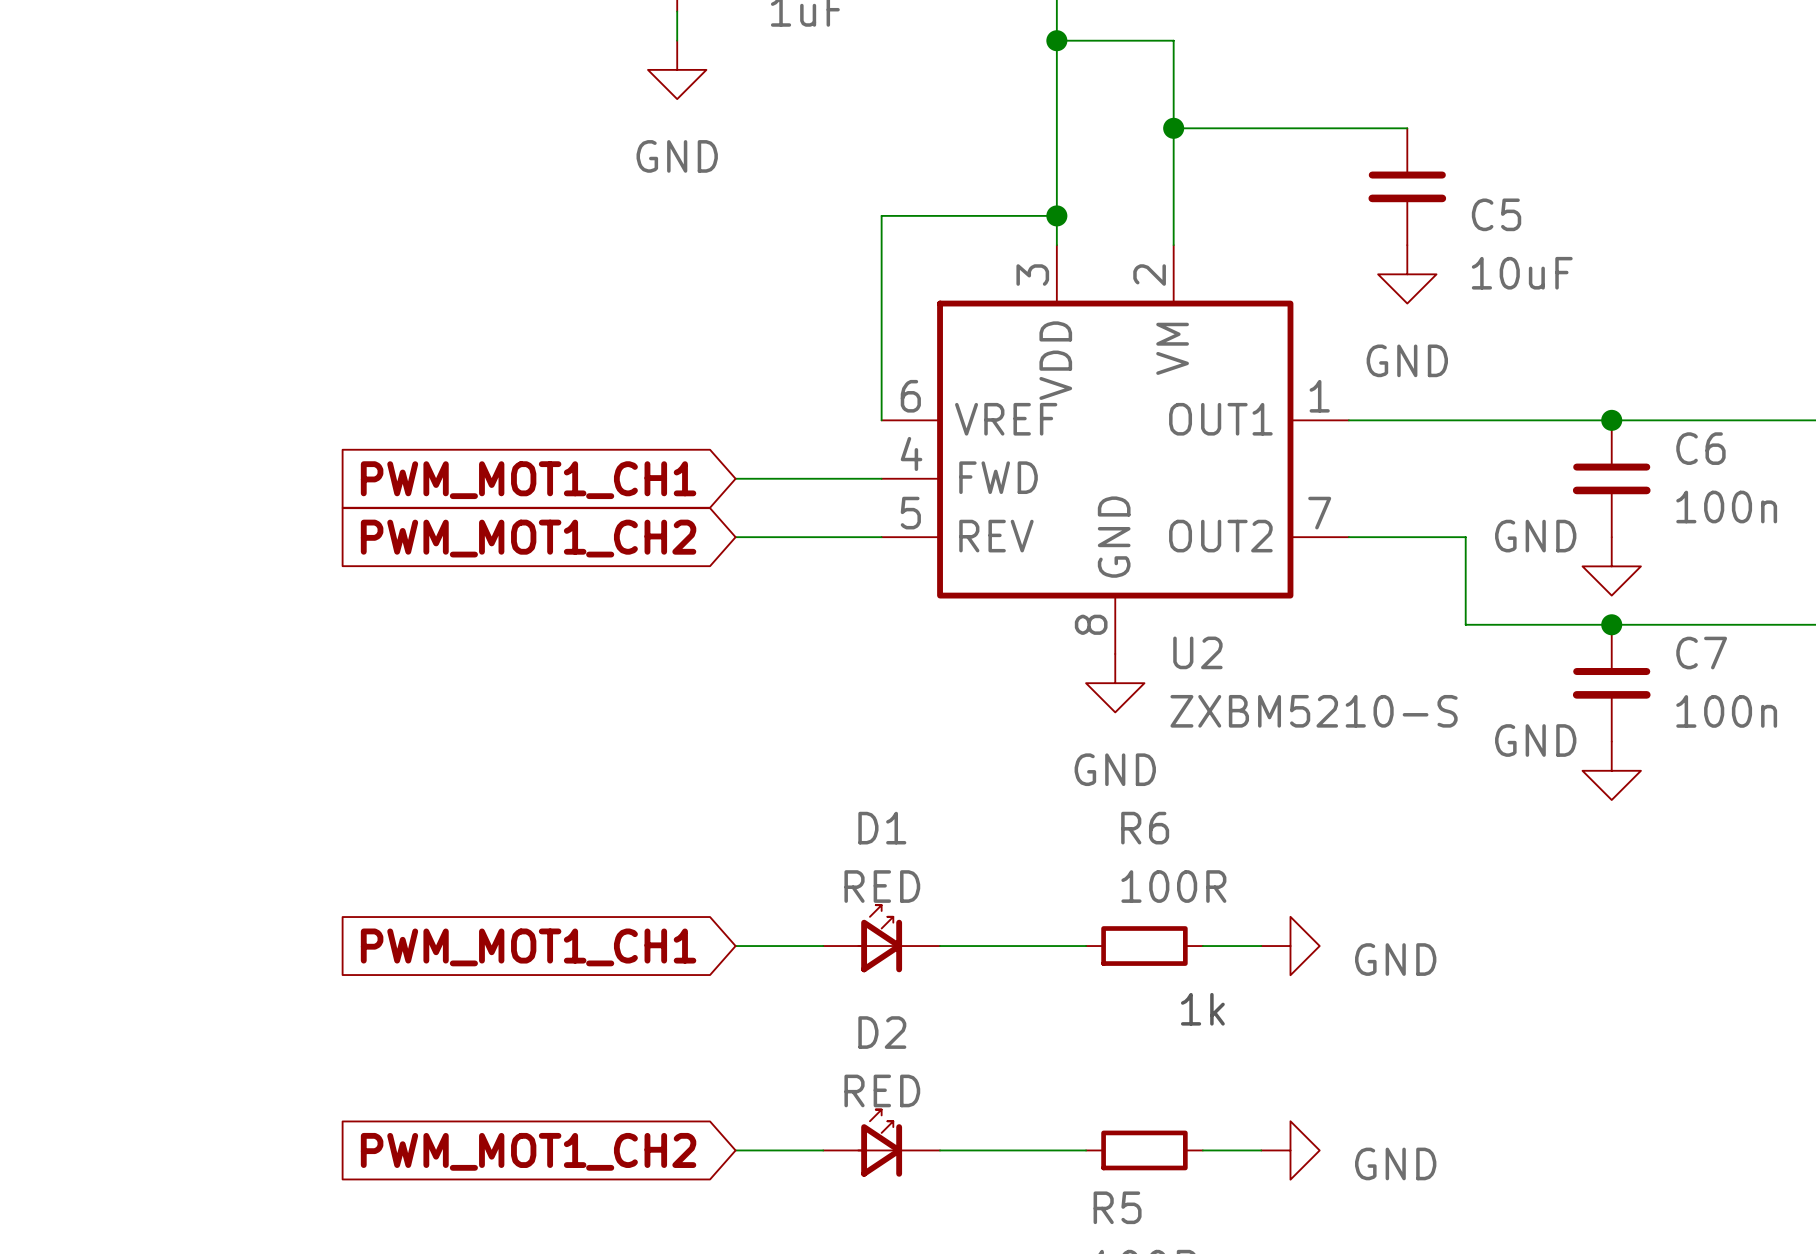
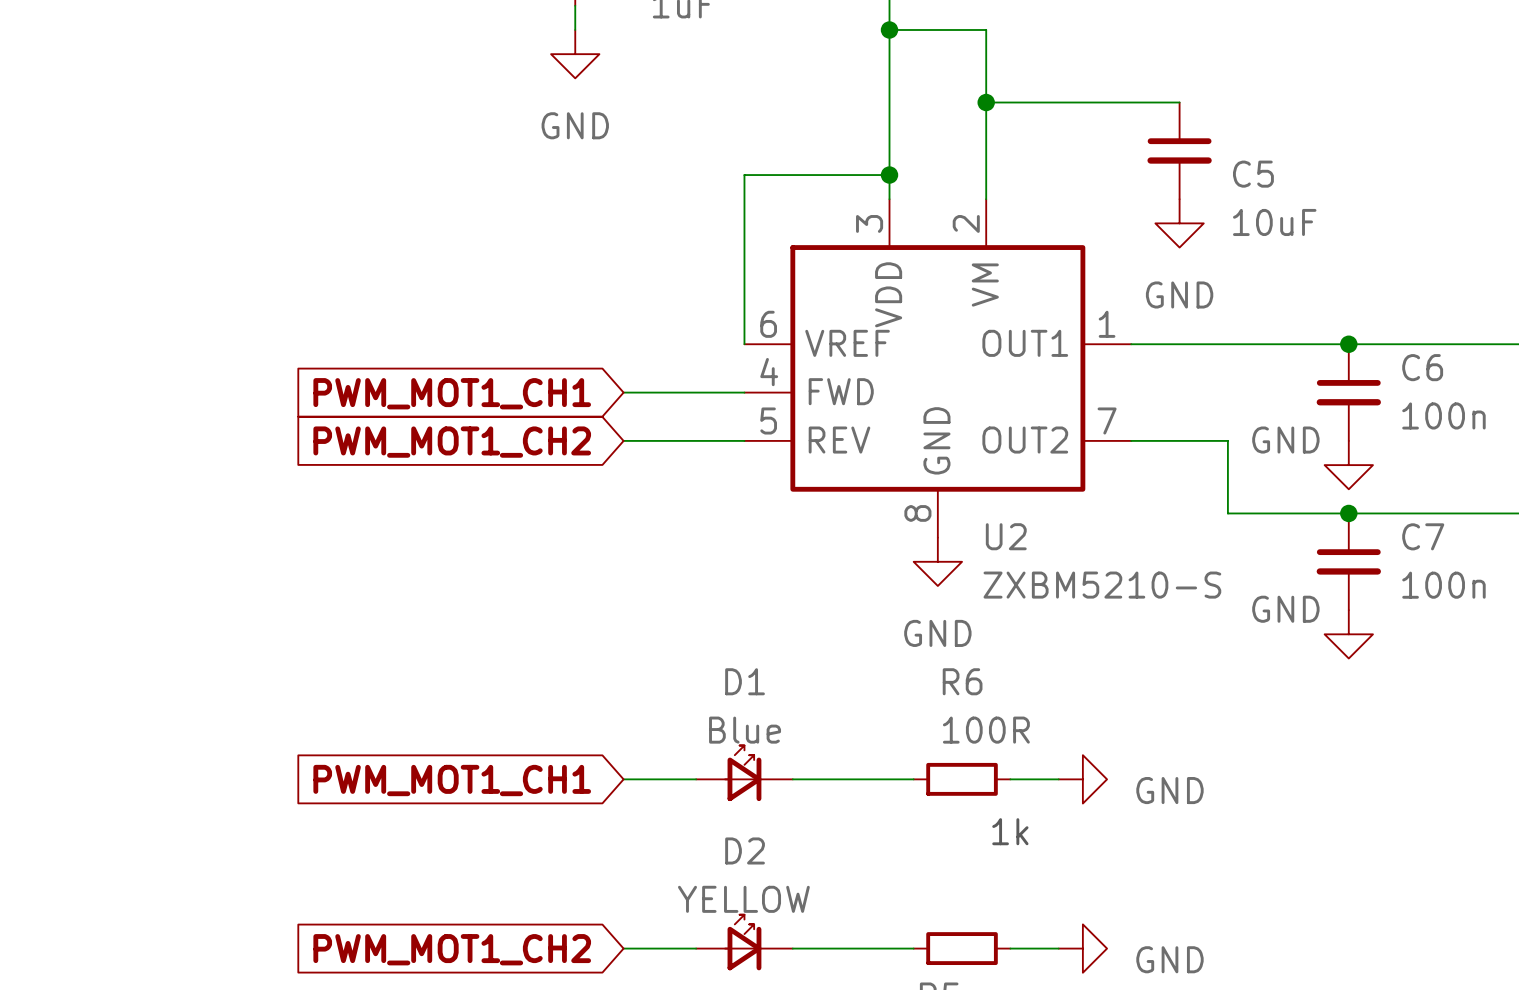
D1 value: RED (882, 886) -> Blue (745, 730)
D2 value: RED (882, 1090) -> YELLOW (743, 899)

